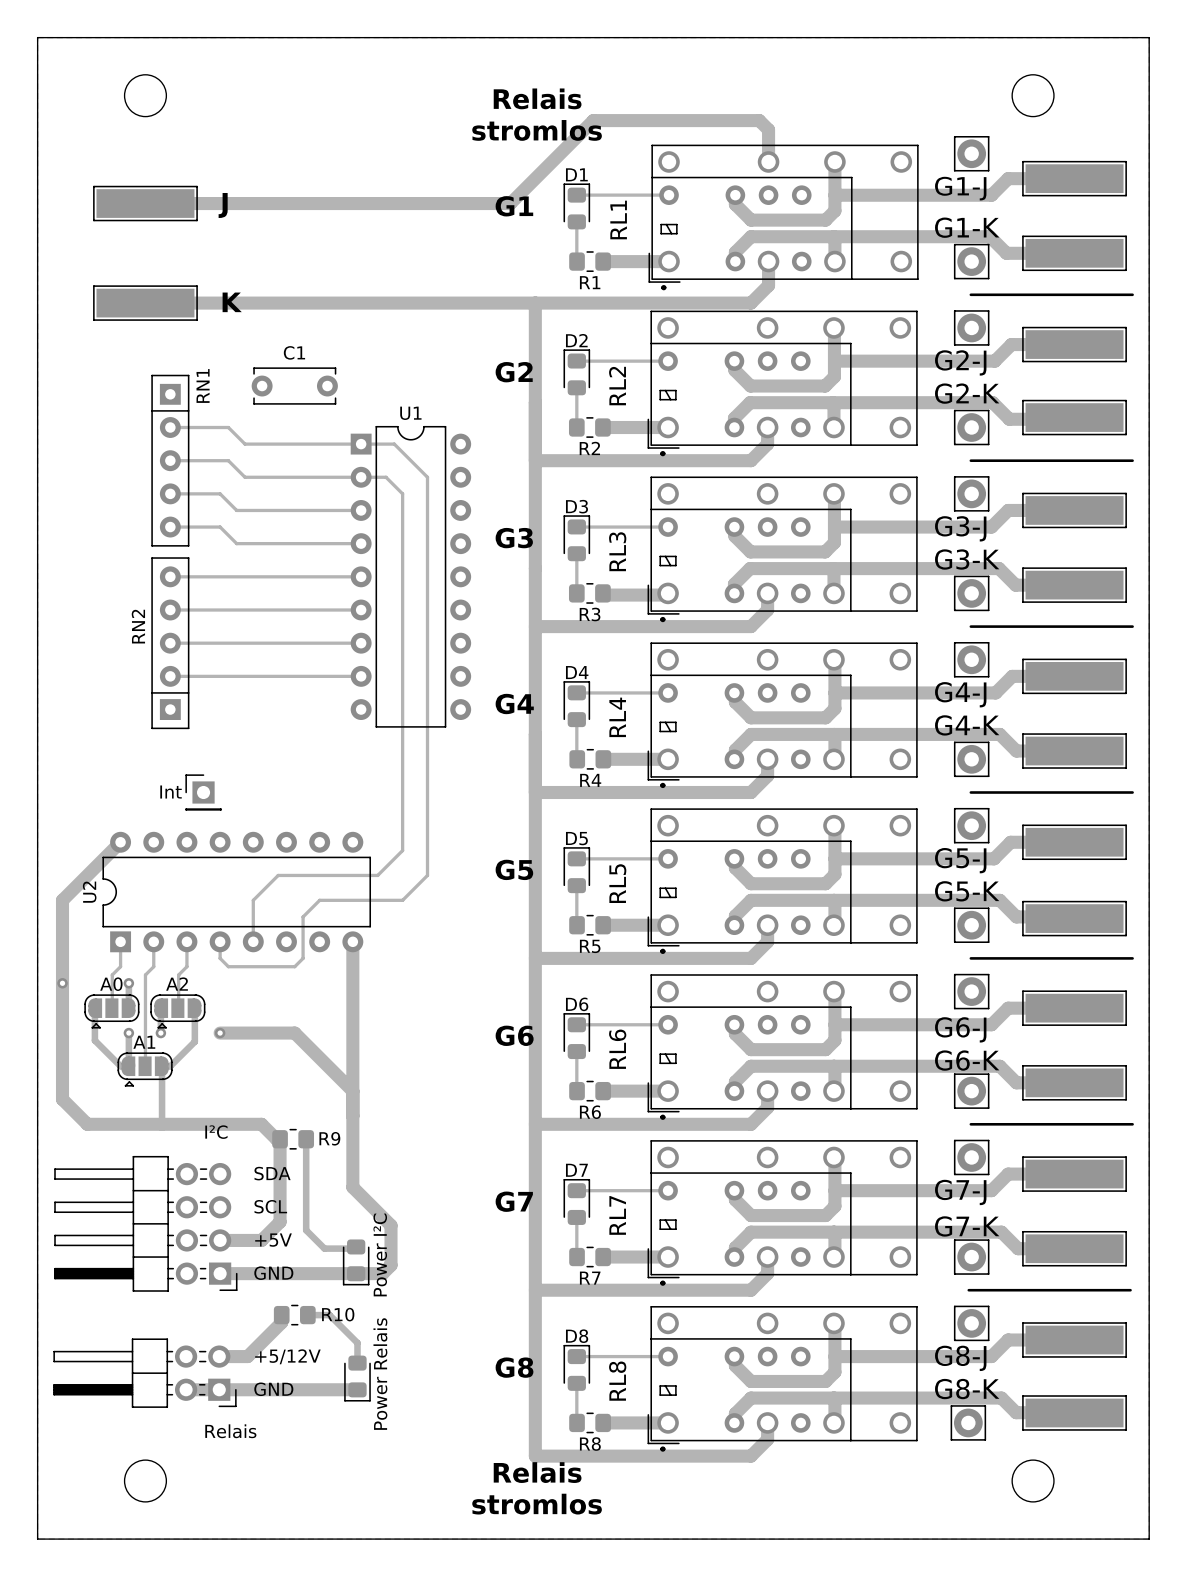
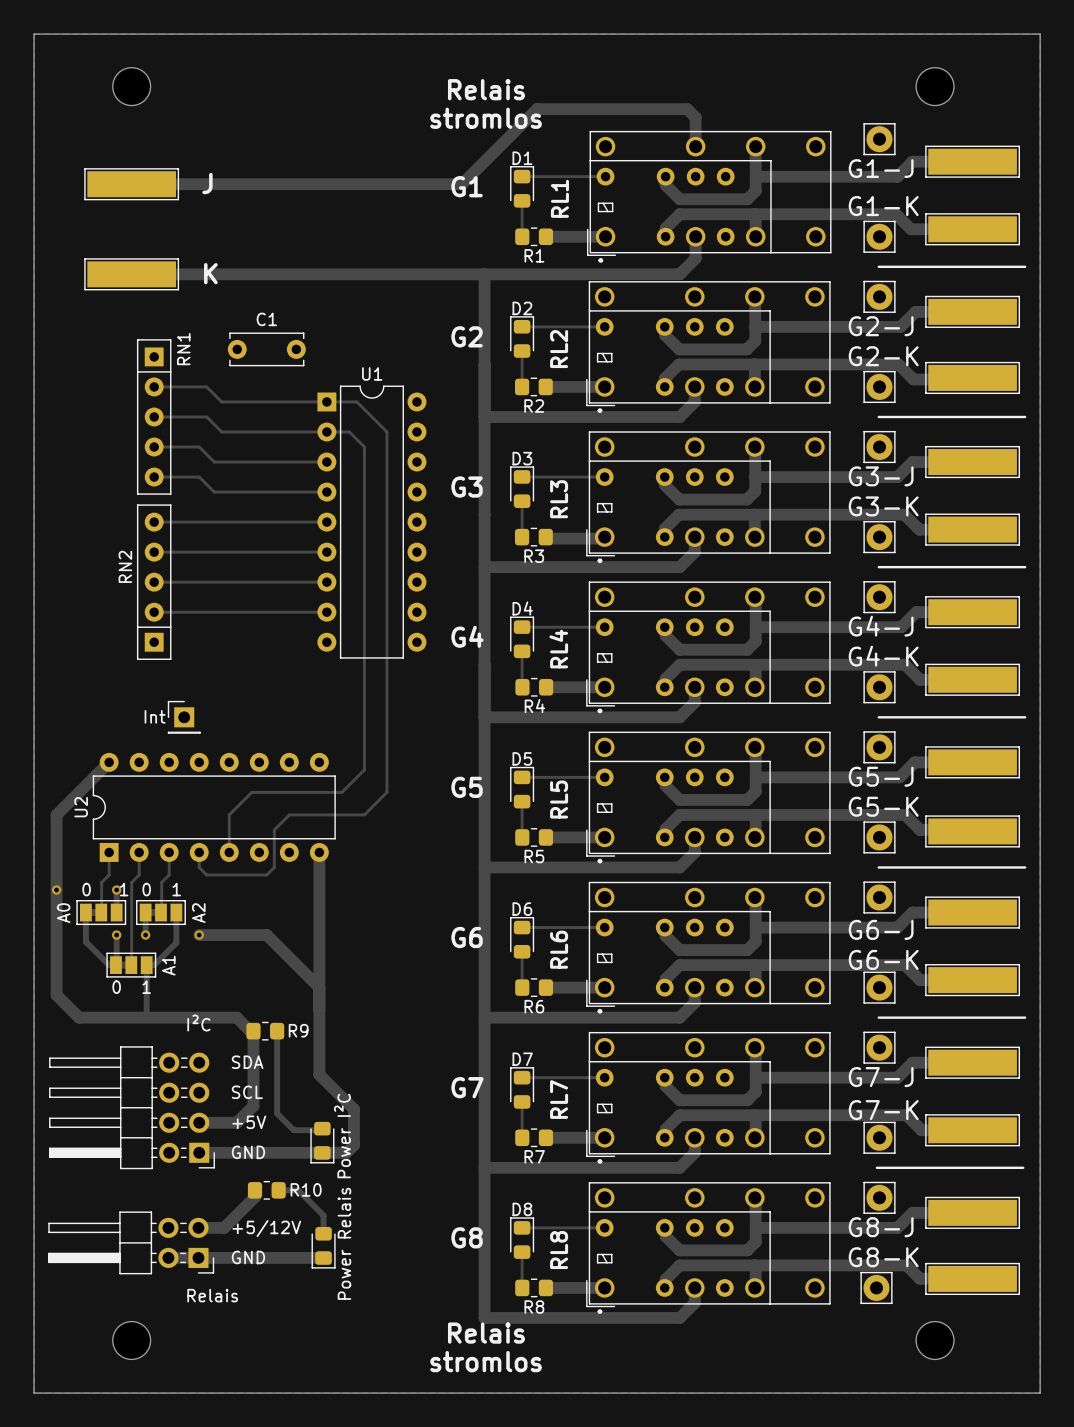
A0 name position: A0 (111, 984) -> A0 (63, 913)
A2 name position: A2 (177, 984) -> A2 (198, 913)
A0 footprint: [84, 994, 140, 1029] -> [76, 900, 127, 926]
A2 footprint: [150, 994, 206, 1029] -> [136, 900, 186, 926]
A1 name position: A1 (144, 1042) -> A1 (168, 965)
A1 footprint: [117, 1052, 173, 1087] -> [106, 952, 157, 978]

